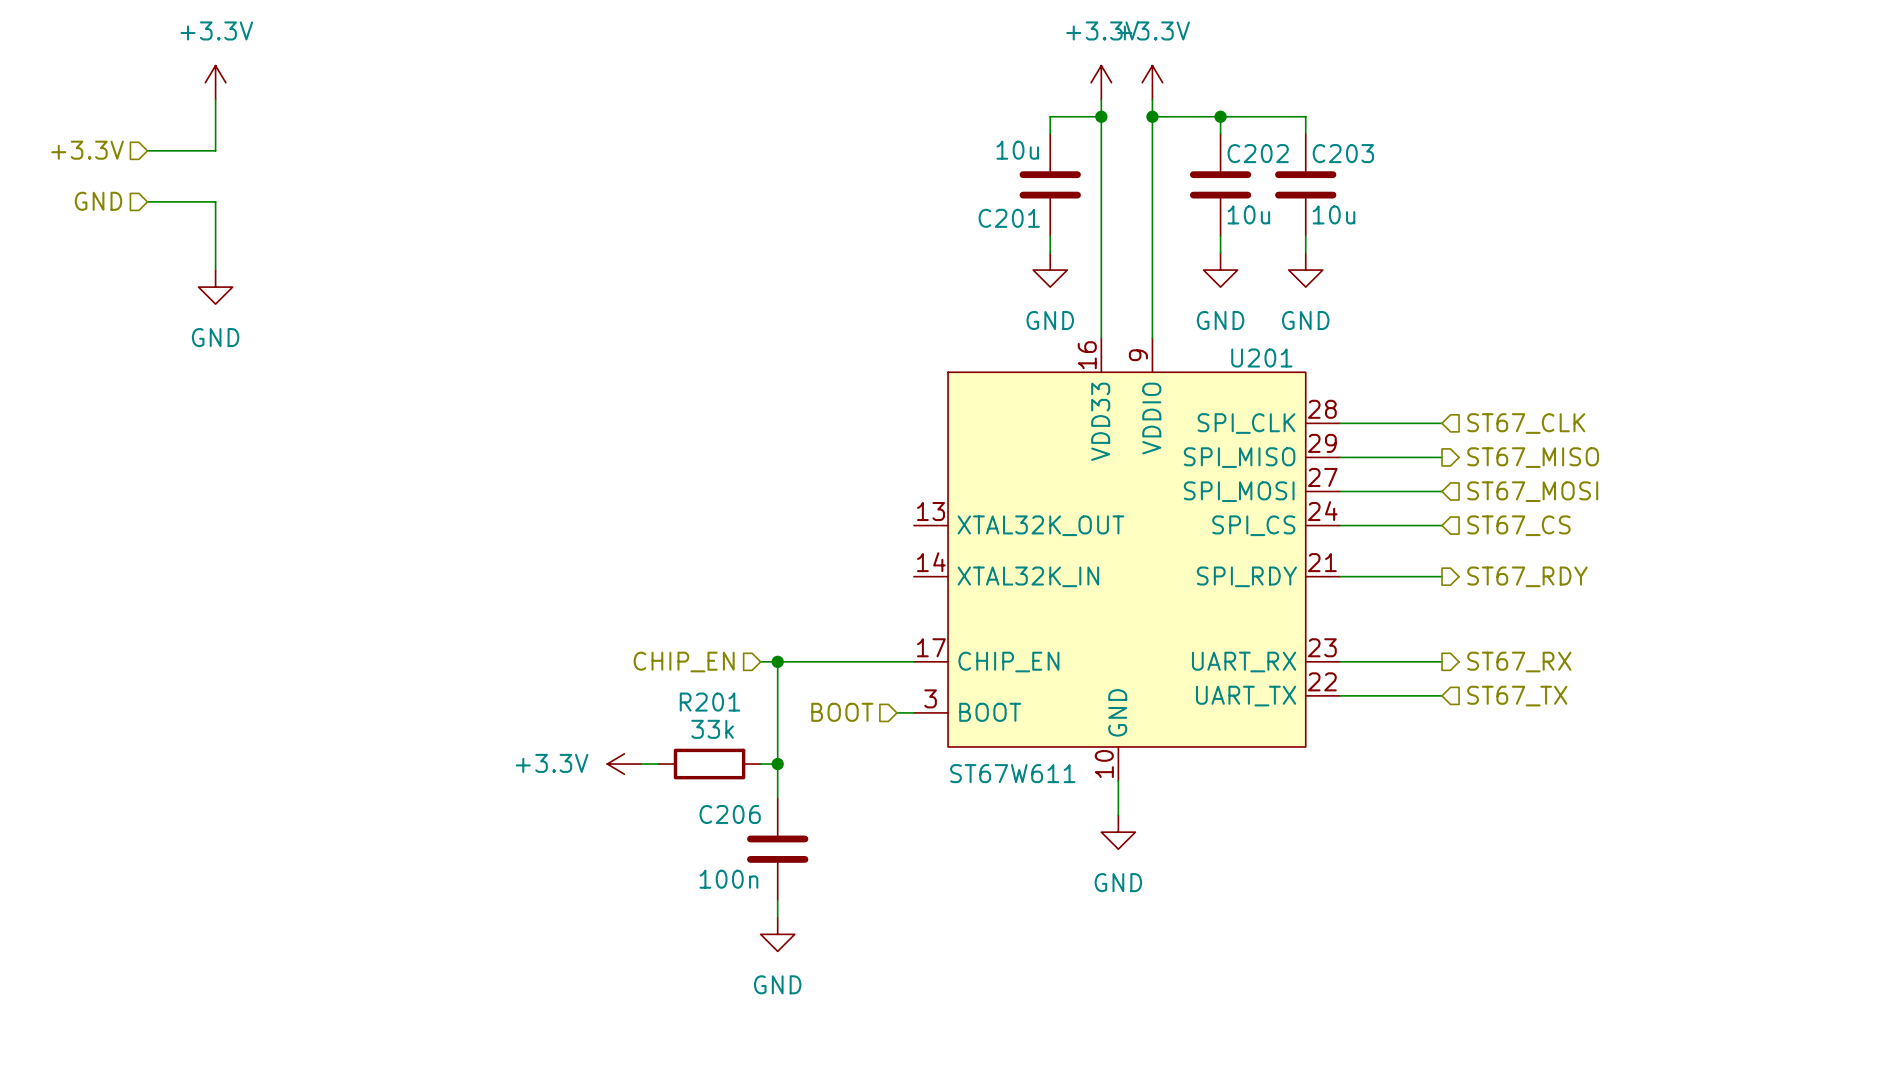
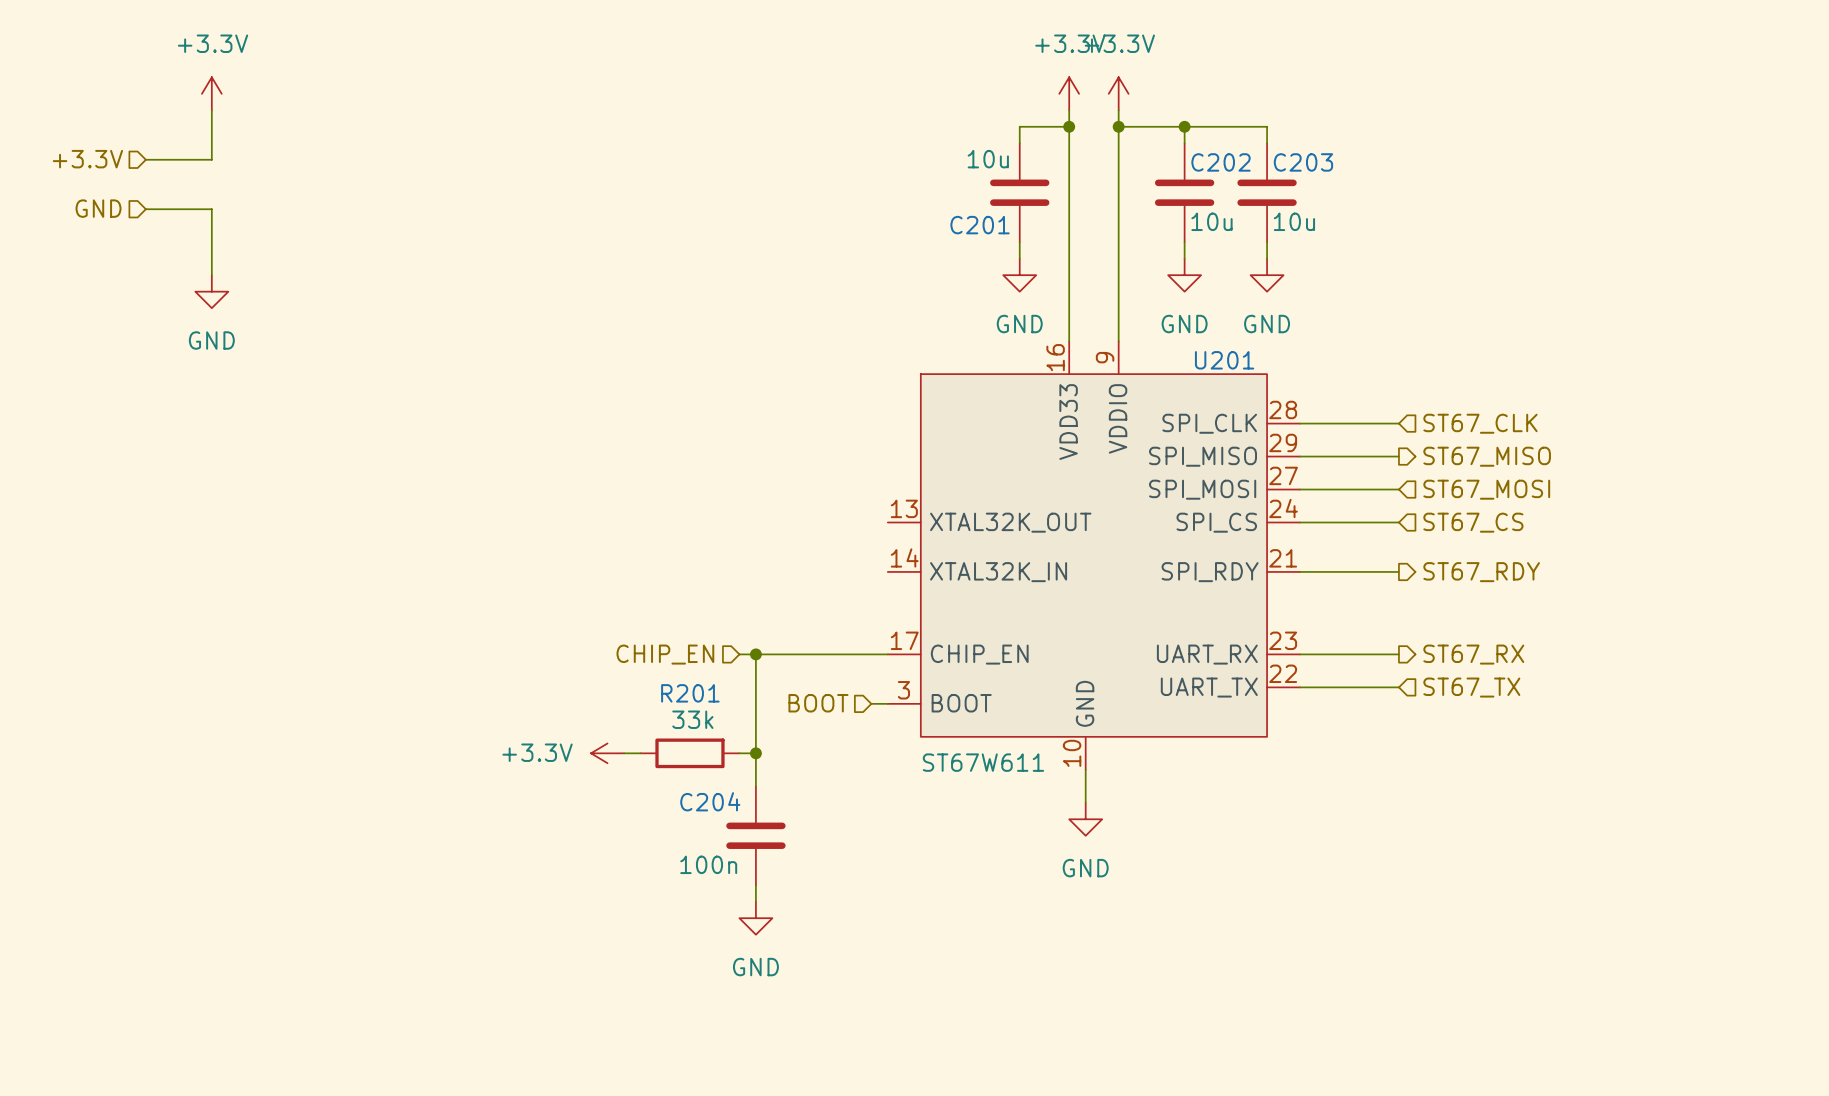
C206 name: C206 (730, 814) -> C204 (710, 801)

